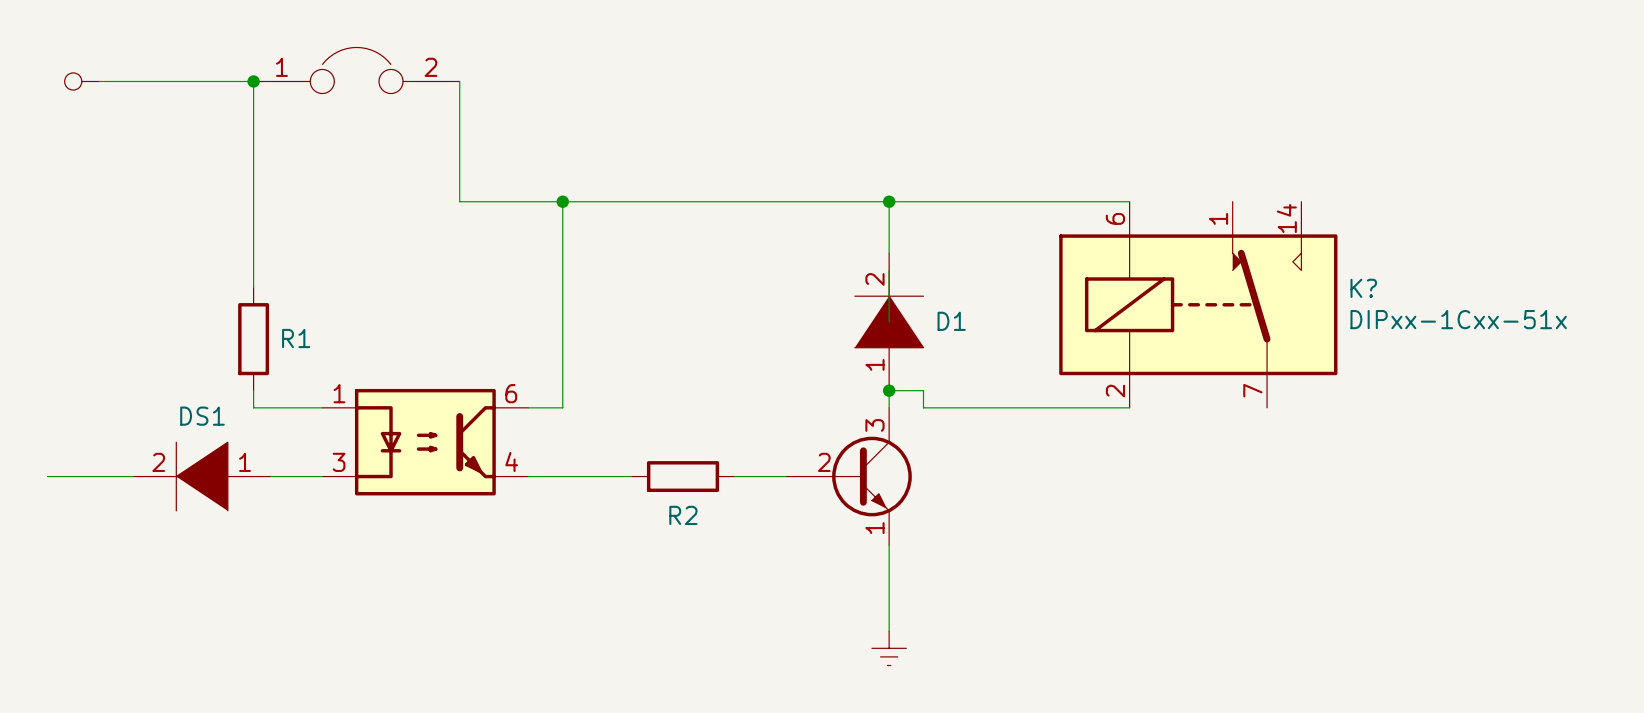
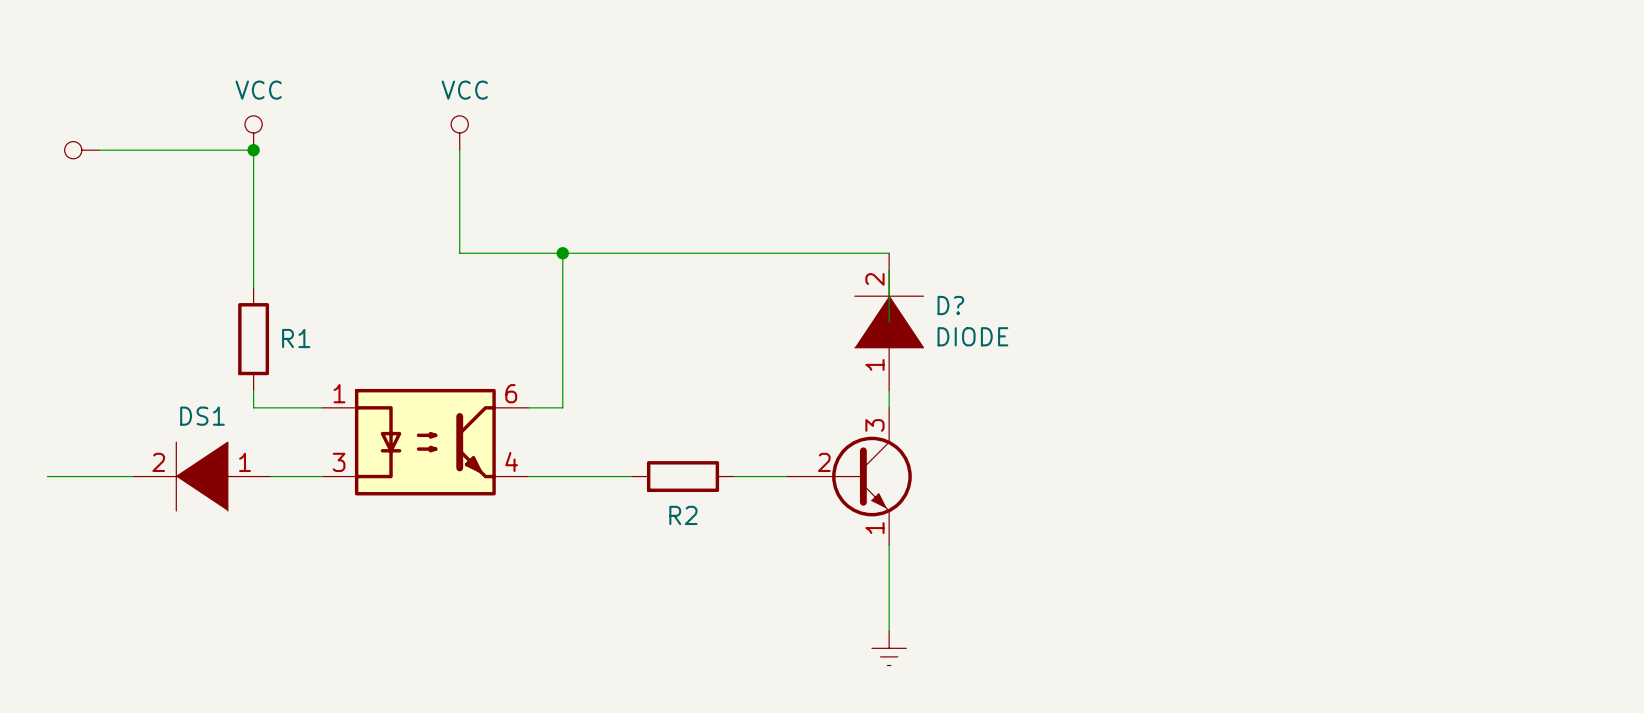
part: (356, 70) -> none
power symbol position: (81, 81) -> (81, 150)
wire: (99, 81) (253, 81) (253, 150) -> (99, 150) (253, 150)
junction position: (253, 81) -> (253, 150)
wire: (459, 81) (459, 150) -> none
power symbol: none -> VCC (253, 133)
power symbol: none -> VCC (459, 133)
wire: (459, 201) (1129, 201) -> (459, 201) (459, 253) (889, 253)
wire: (562, 201) (562, 253) -> none
junction position: (562, 201) -> (562, 253)
wire: (889, 201) (889, 253) -> none
junction: (889, 201) -> none
K?: DIPxx-1Cxx-51x (1198, 304) -> none
D1 name: D1 (951, 321) -> D? (950, 305)
D1 value: none -> DIODE (972, 336)
wire: (889, 390) (923, 390) (923, 407) (1129, 407) -> none
junction: (889, 390) -> none

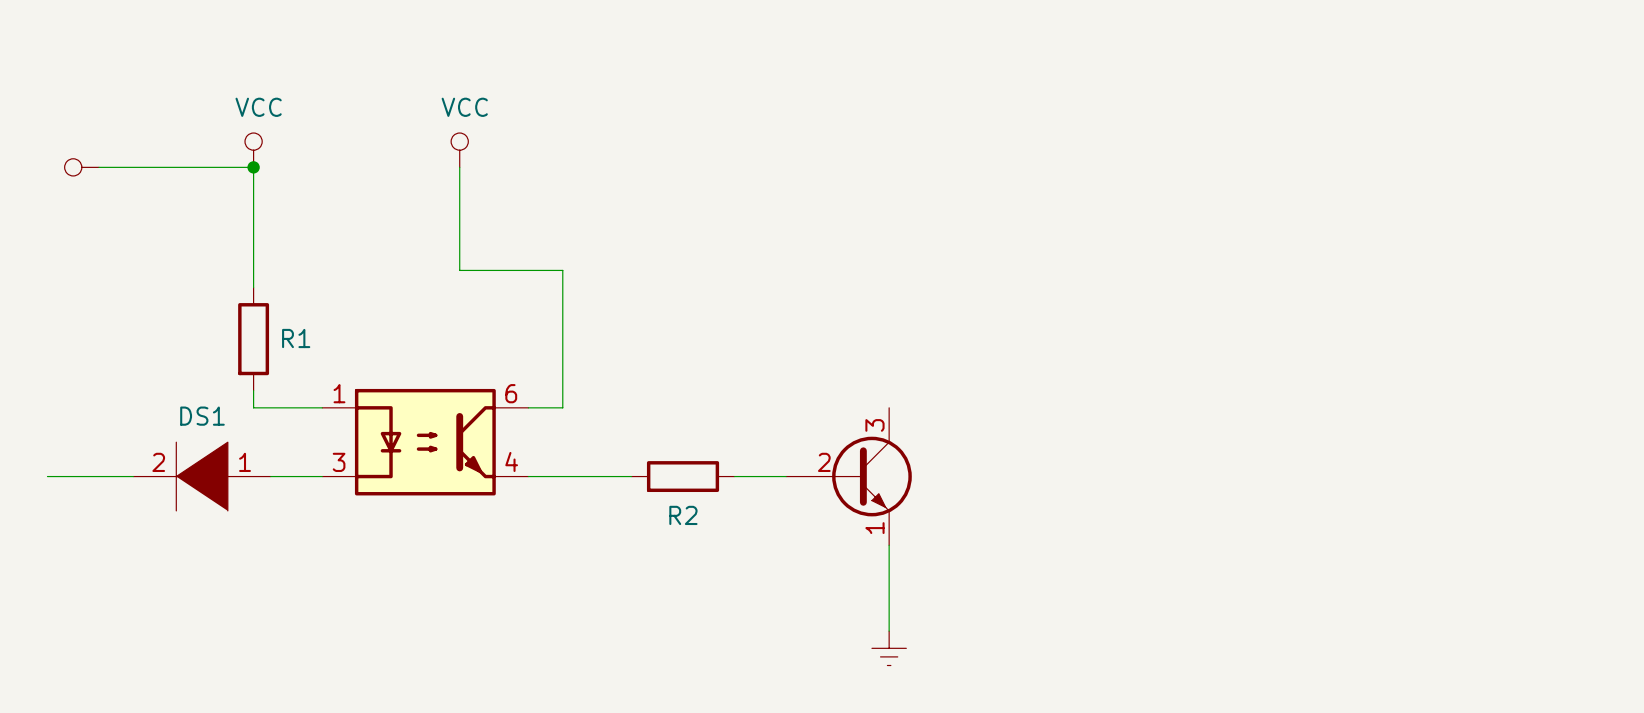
power symbol position: VCC (253, 133) -> VCC (253, 150)
power symbol position: VCC (459, 133) -> VCC (459, 150)
power symbol position: (81, 150) -> (81, 167)
wire: (99, 150) (253, 150) (253, 167) -> (99, 167) (253, 167)
junction position: (253, 150) -> (253, 167)
wire: (459, 253) (889, 253) -> none
wire: (562, 253) (562, 270) -> (459, 253) (459, 270) (562, 270)
junction: (562, 253) -> none
wire: (889, 270) (889, 321) -> none
D?: DIODE (889, 321) -> none
wire: (889, 390) (889, 407) -> none

